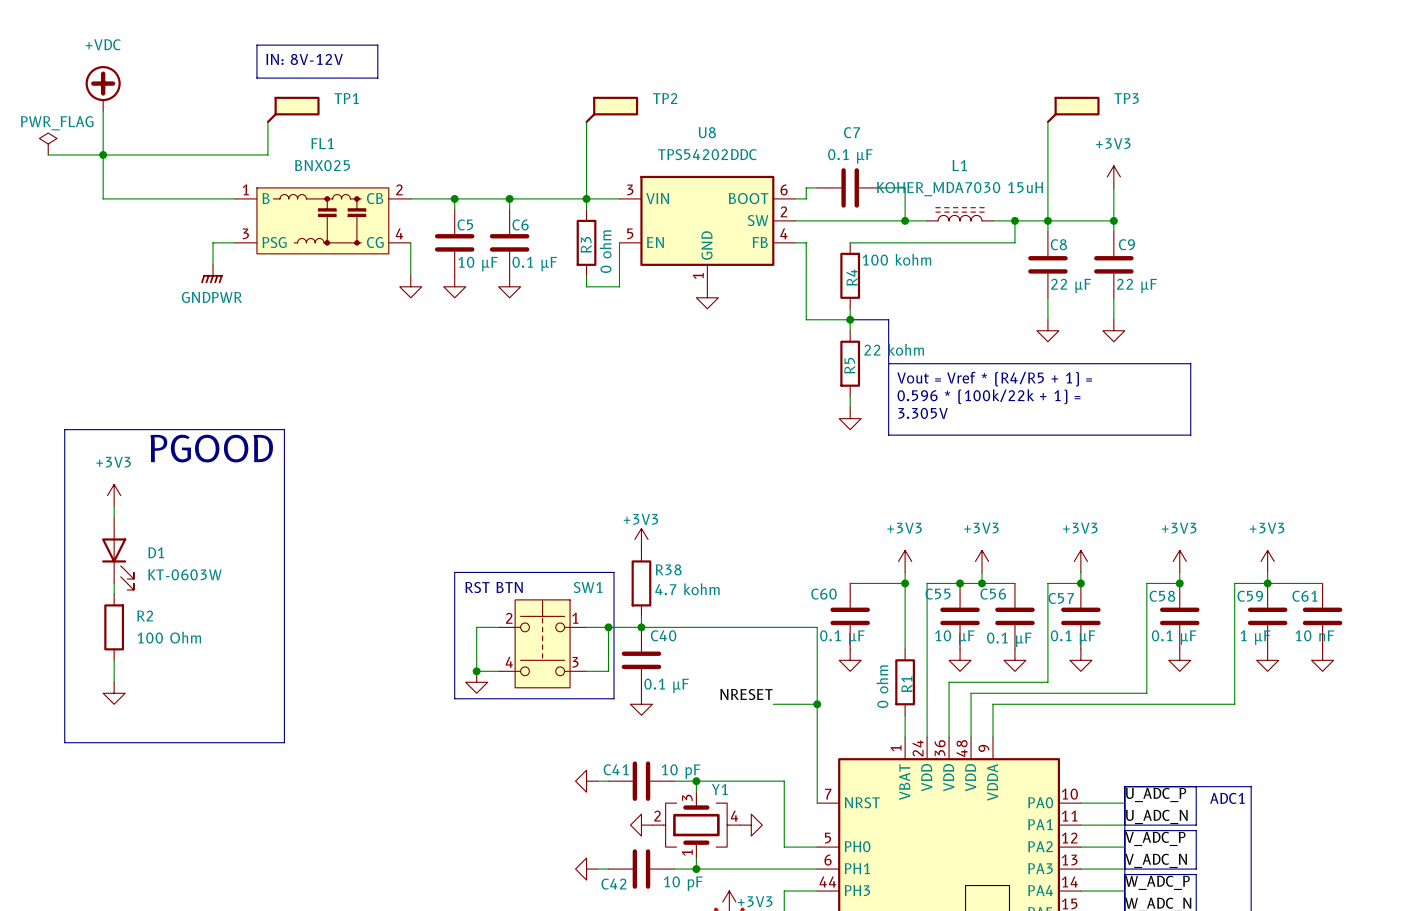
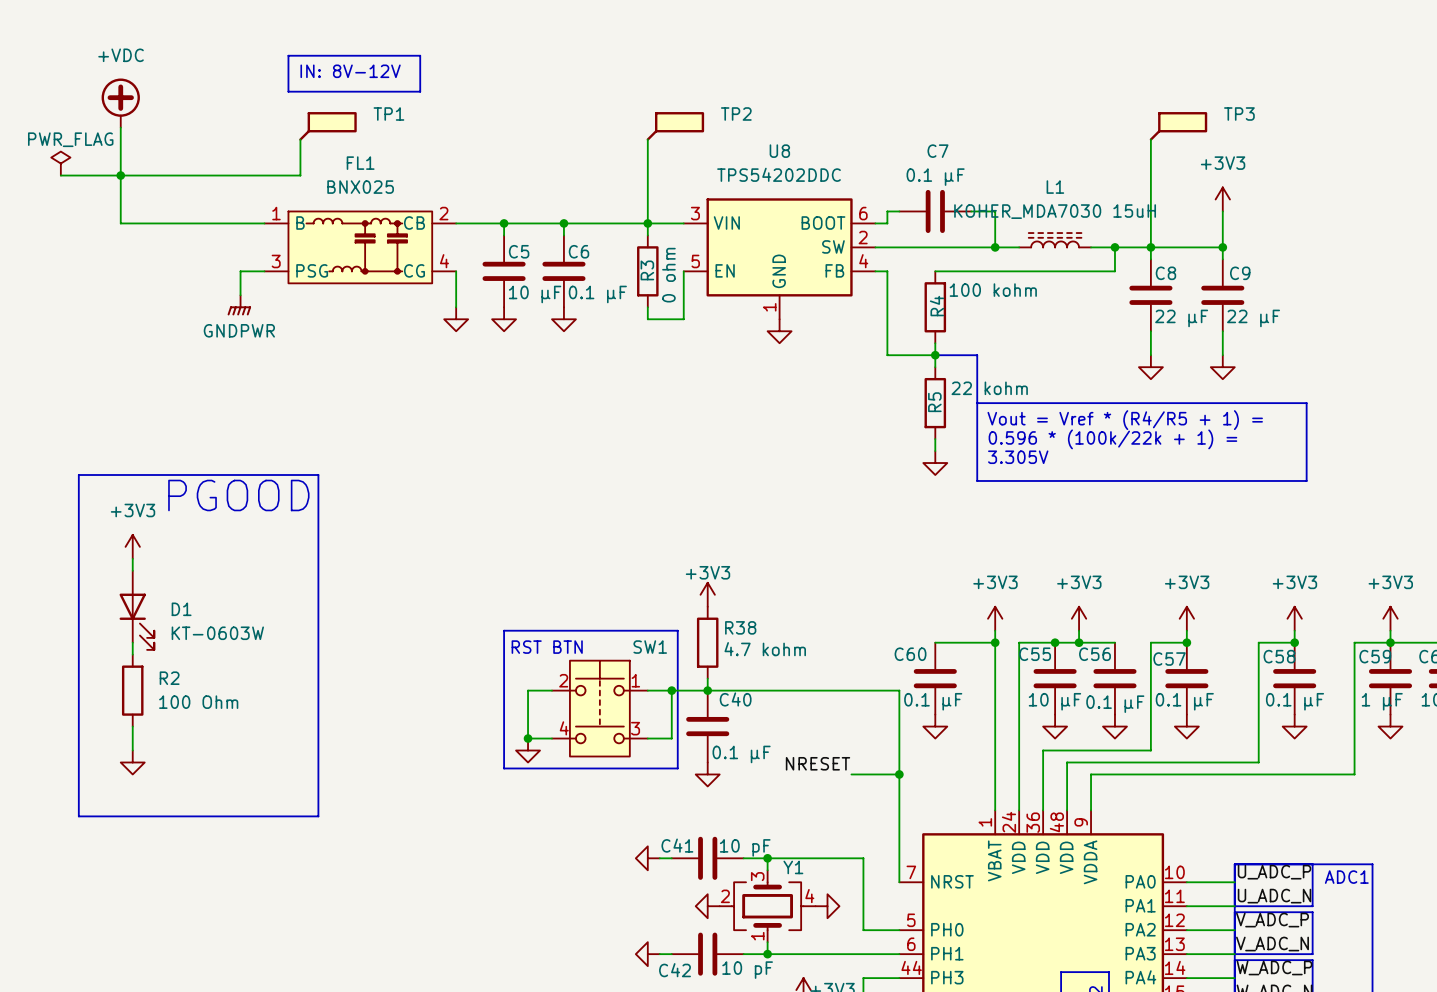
wire: none -> (995, 714) (995, 786)
R1: 0 ohm (905, 682) -> none

